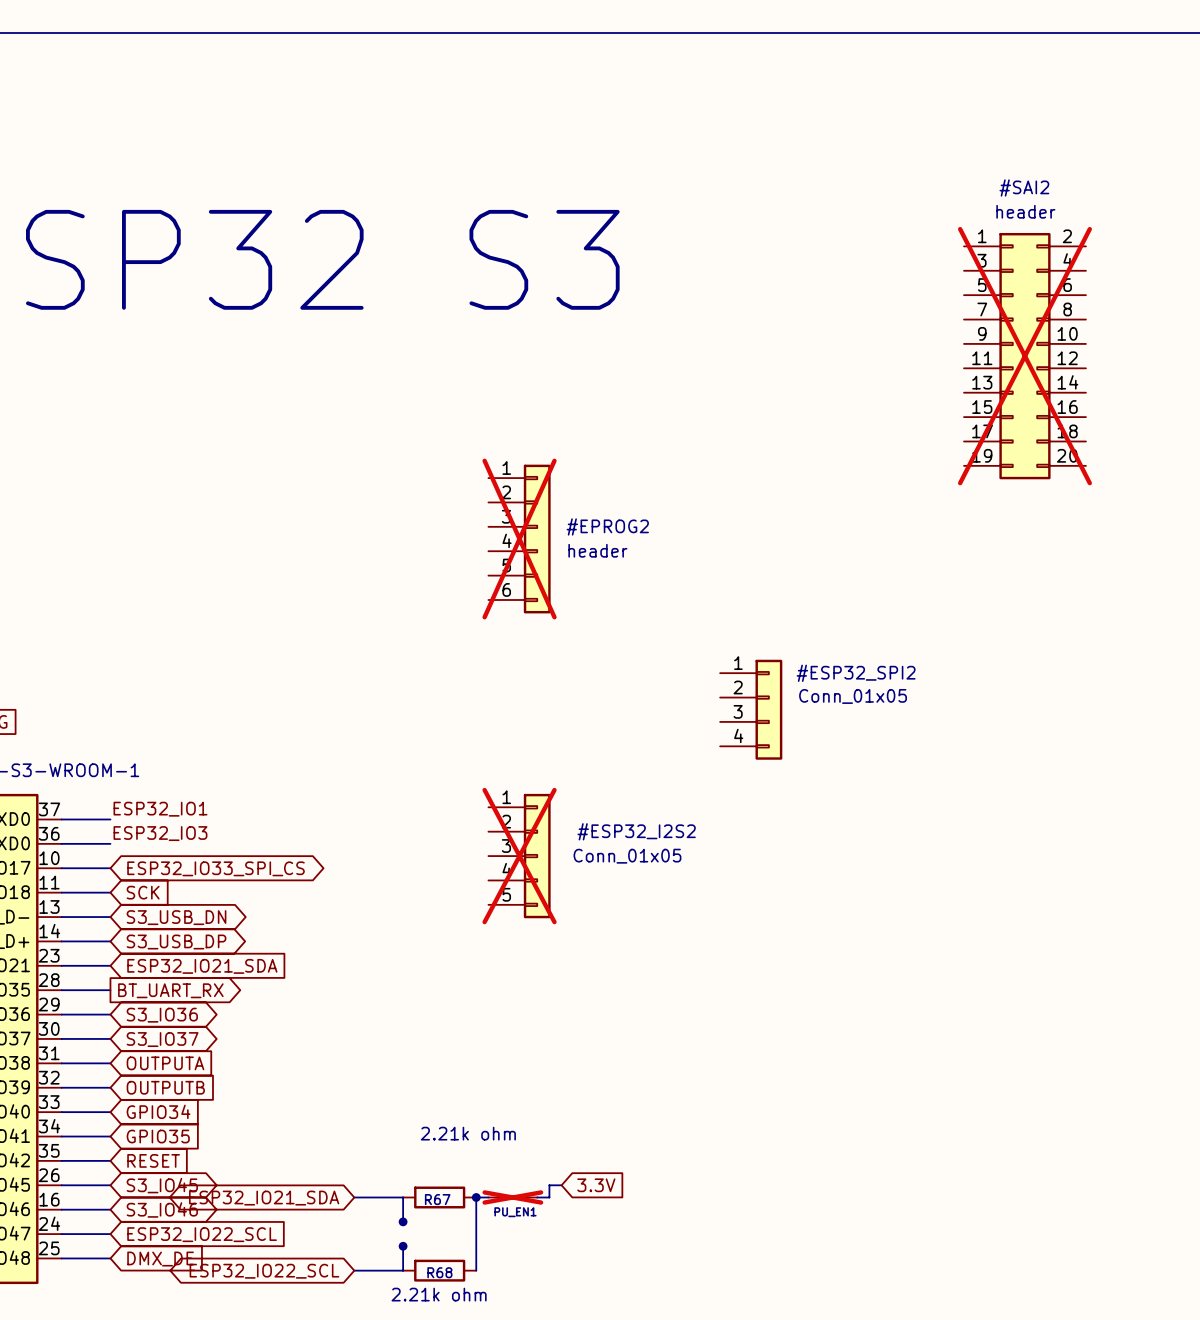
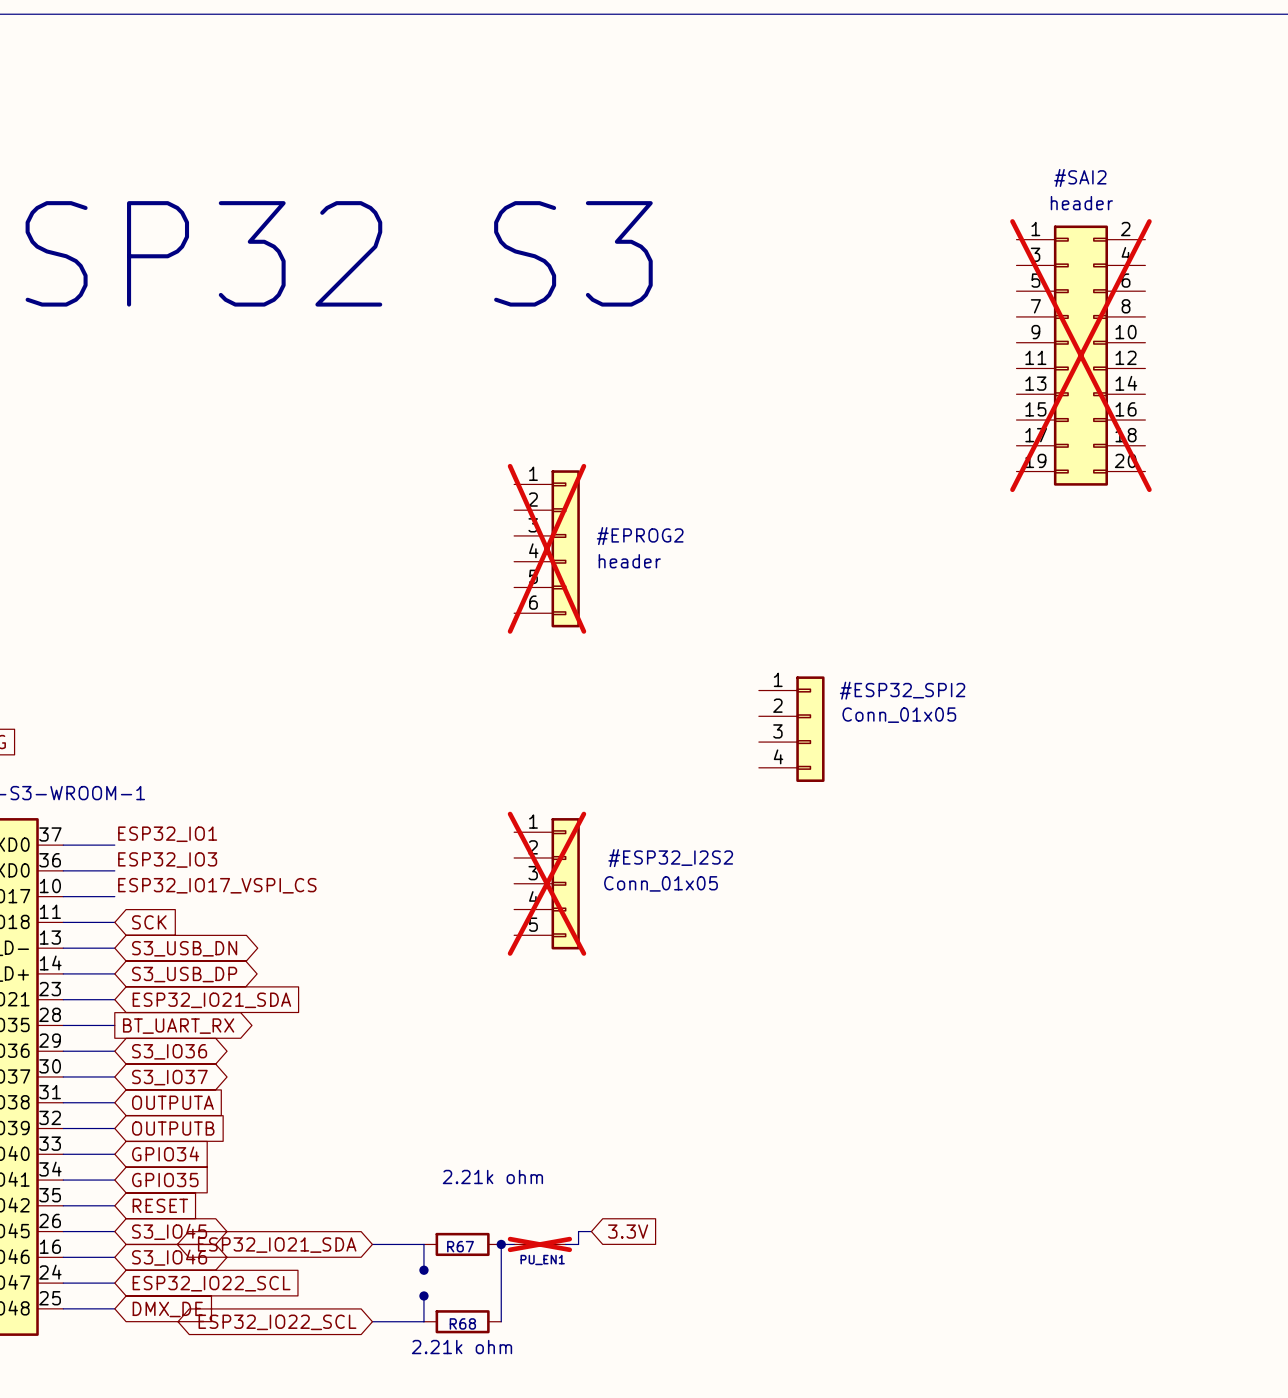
label: none -> ESP32_IO17_VSPI_CS (217, 885)
global label: ESP32_IO33_SPI_CS (216, 868) -> none

